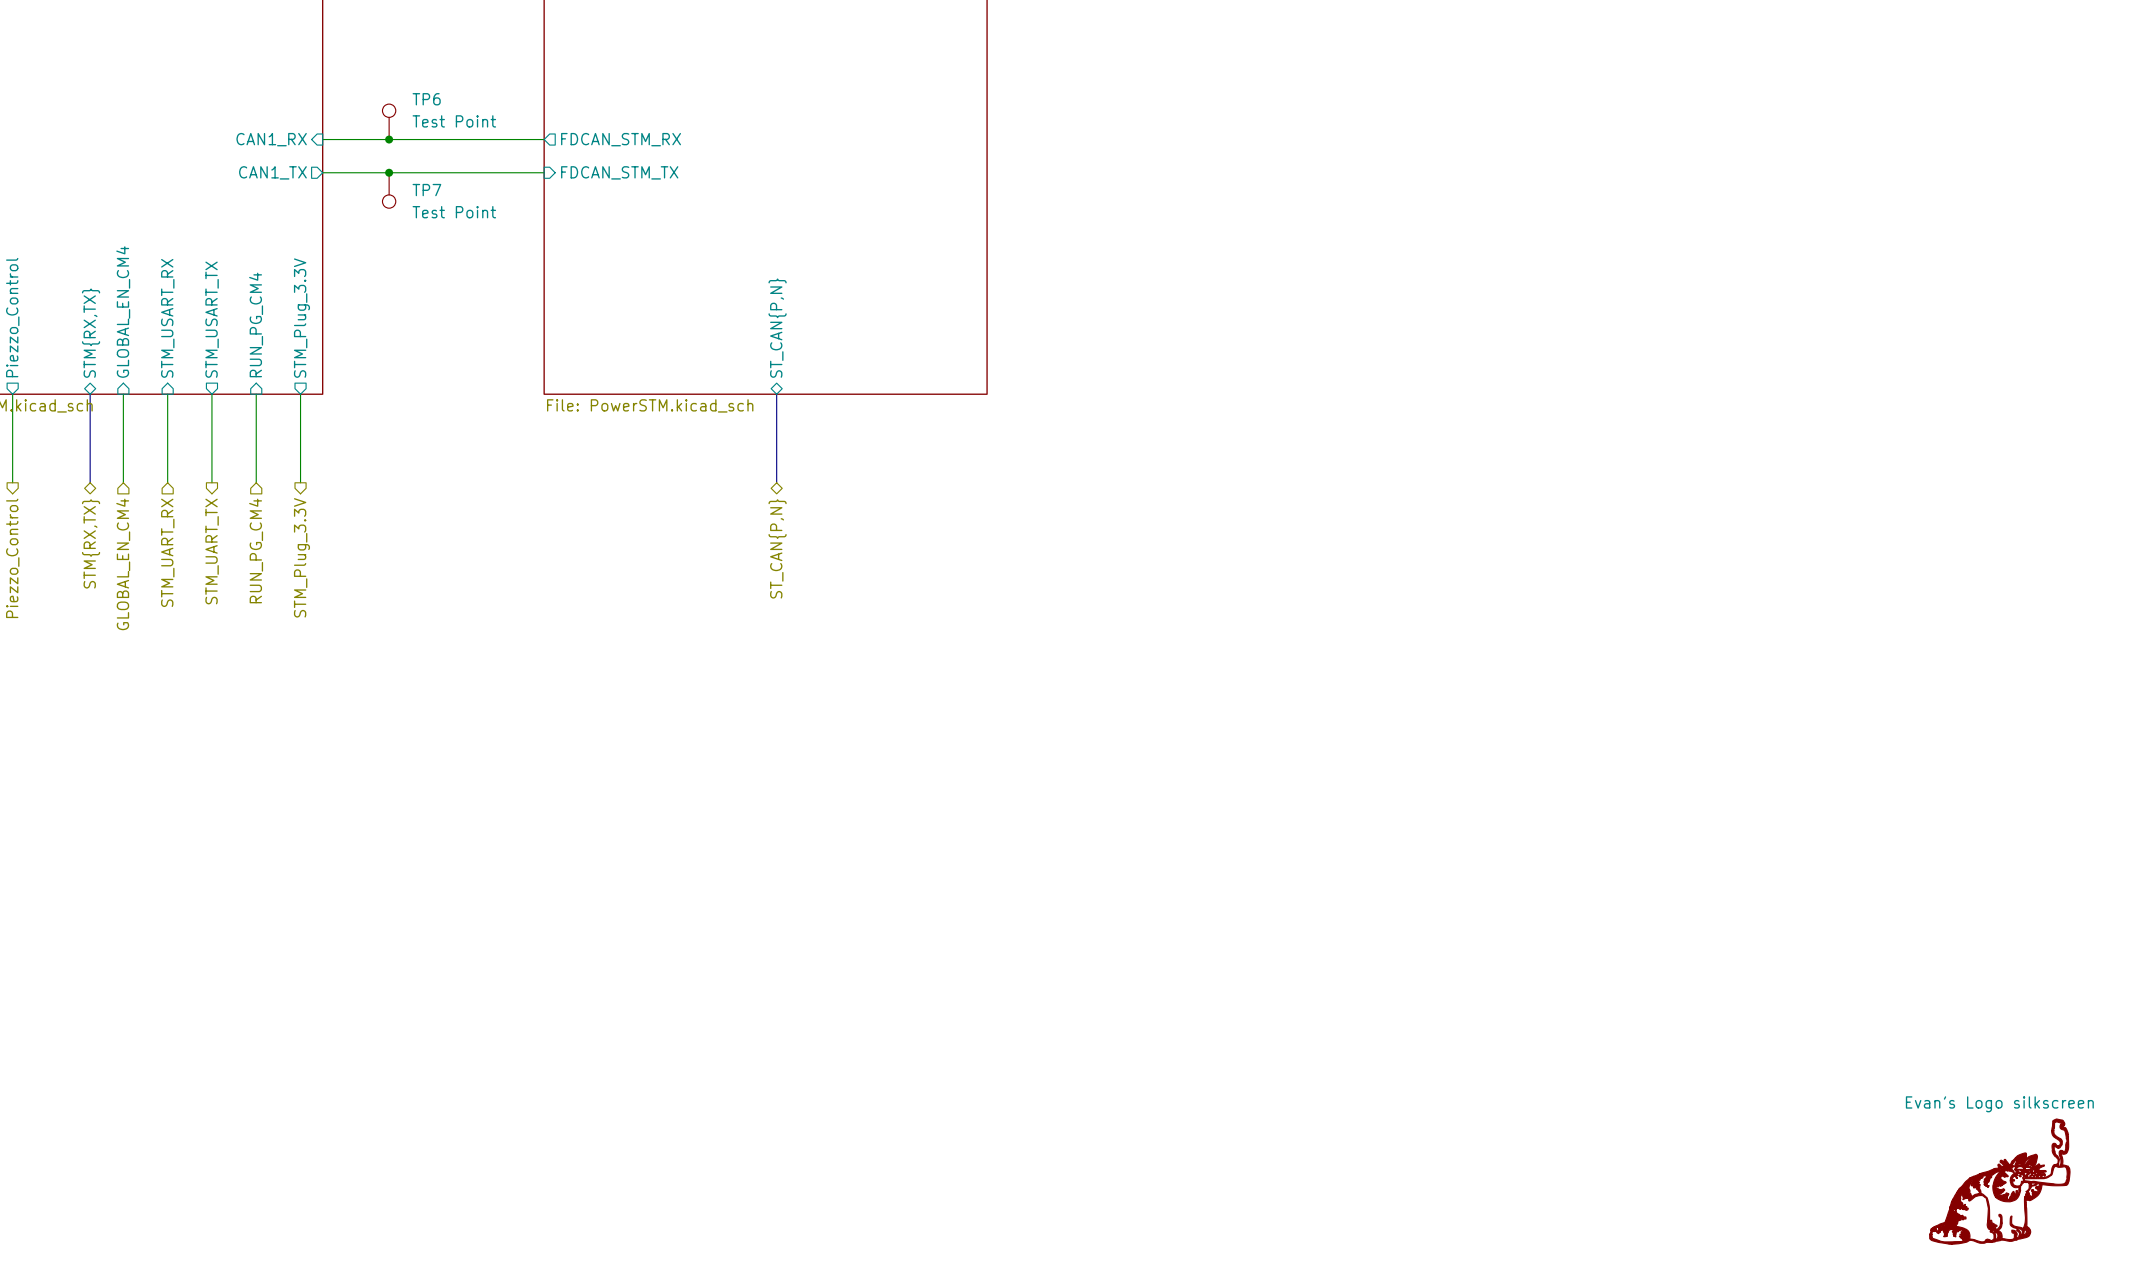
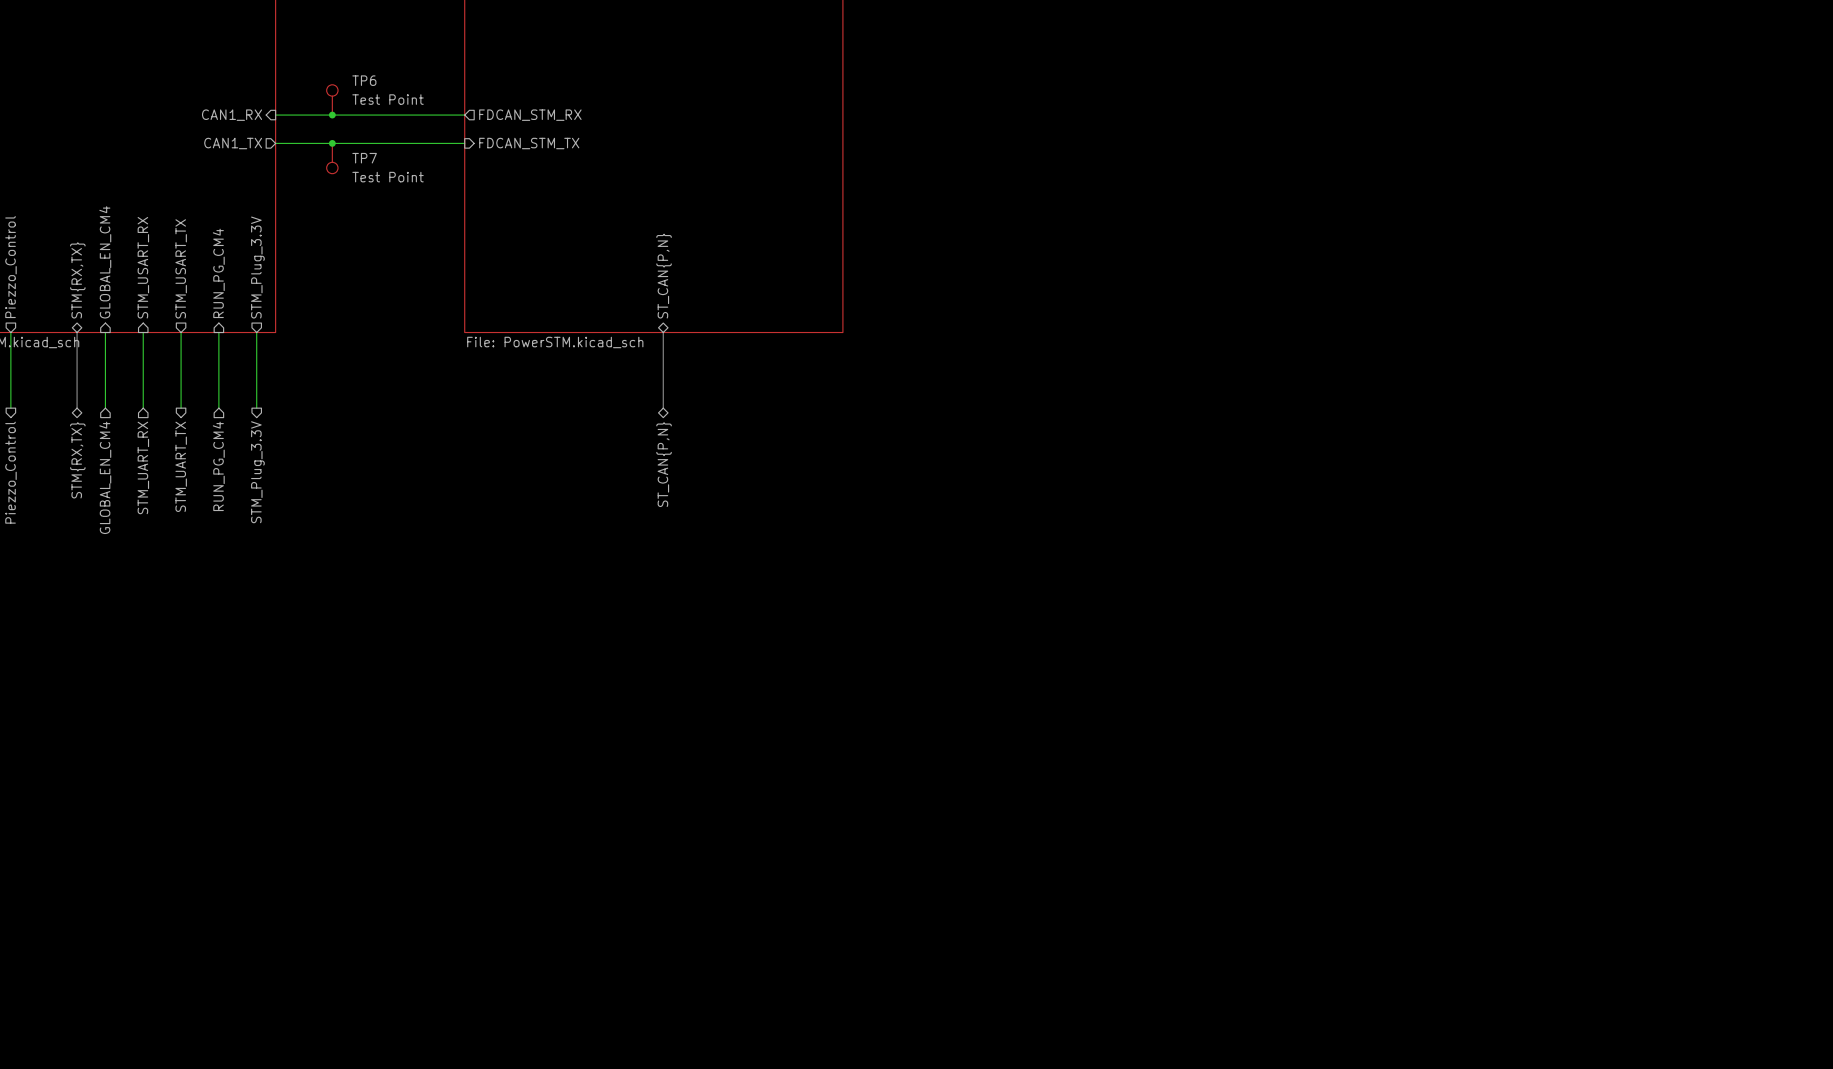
power symbol: Evan's Logo silkscreen (1999, 1181) -> none

